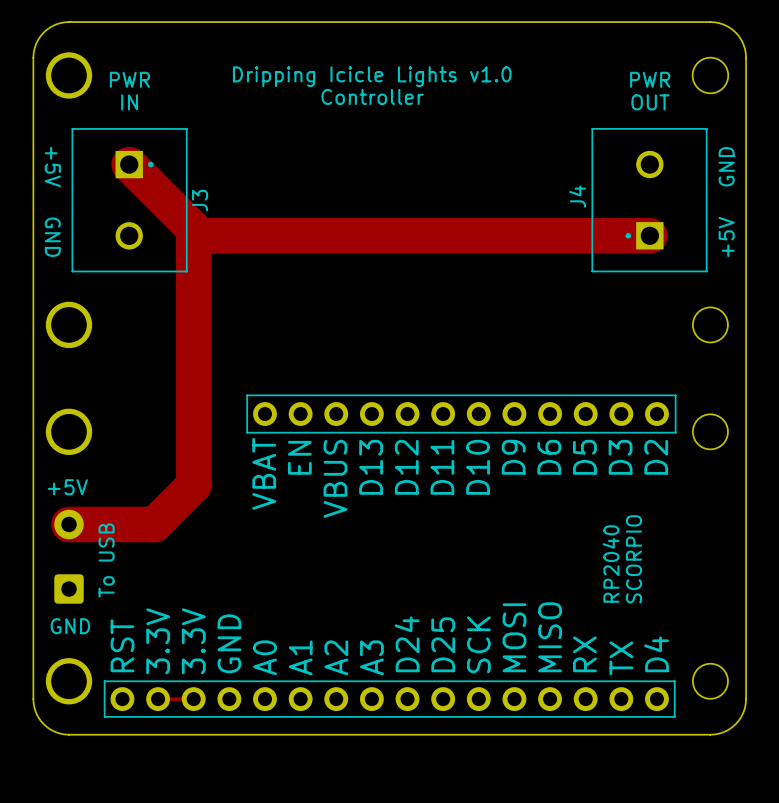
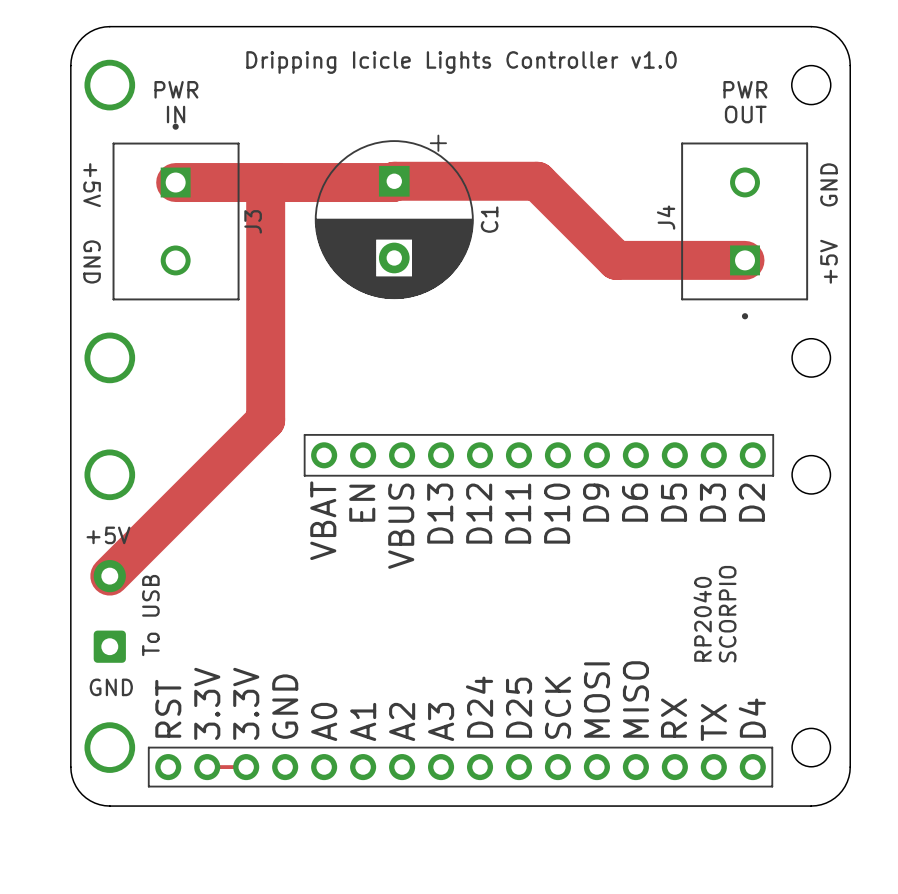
text: Dripping Icicle Lights v1.0 (372, 76) -> Dripping Icicle Lights Controller v1.0 (461, 62)
text: Controller (372, 96) -> none
J4 footprint: [591, 127, 708, 273] -> [681, 142, 809, 320]
J3 footprint: [71, 128, 188, 273] -> [112, 123, 240, 301]
top track: (129, 164) (193, 229) (193, 485) (154, 524) (69, 524) -> (265, 182) (265, 420) (109, 576)
C1: none -> (394, 216)
top track: (193, 235) (532, 235) -> (175, 182) (537, 181) (616, 260)

